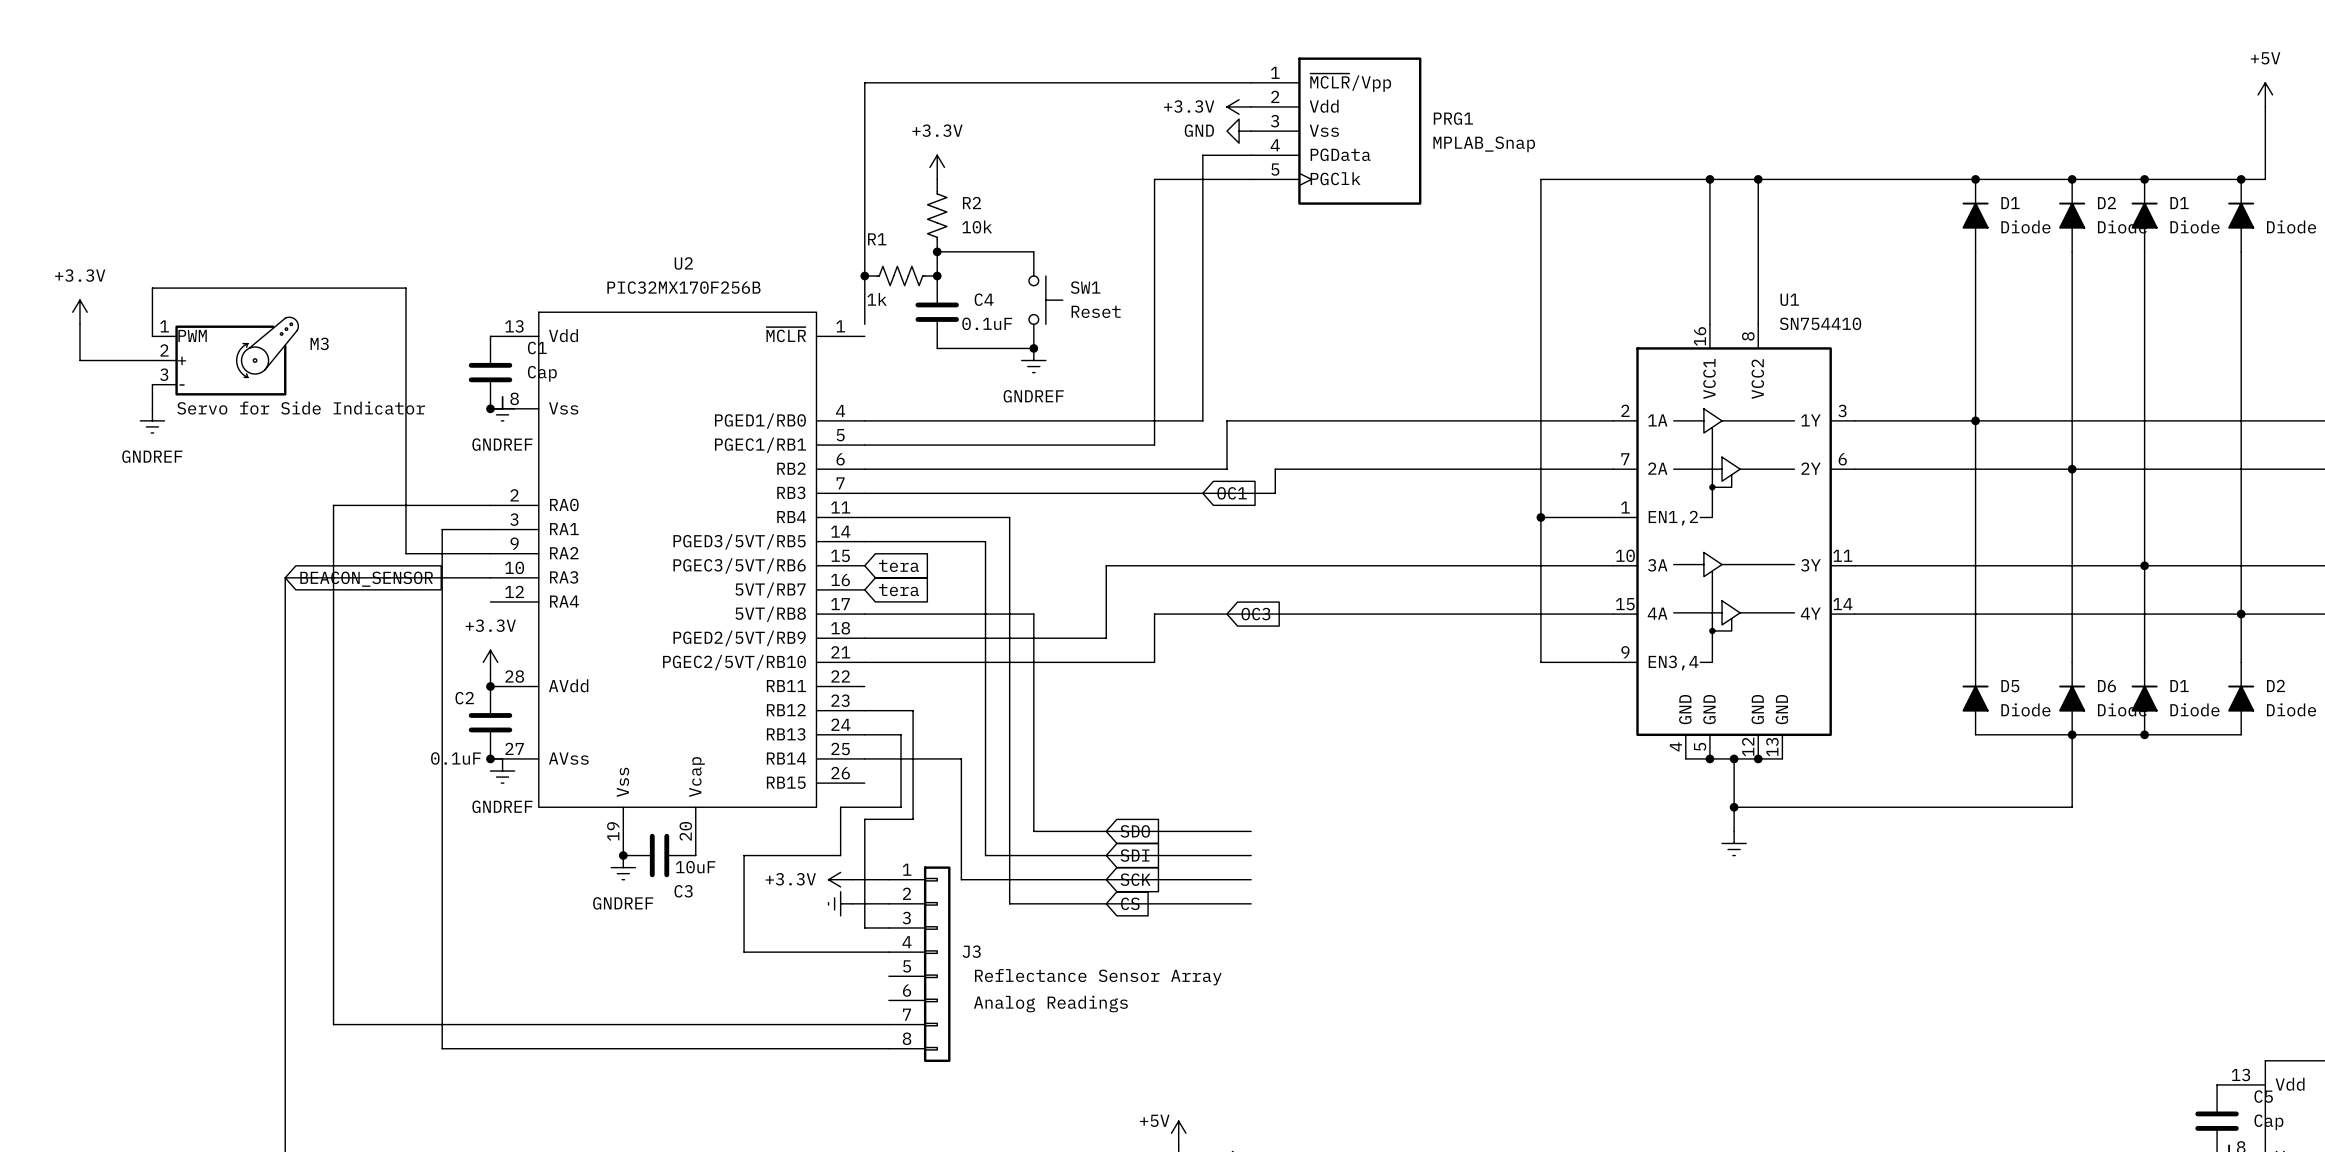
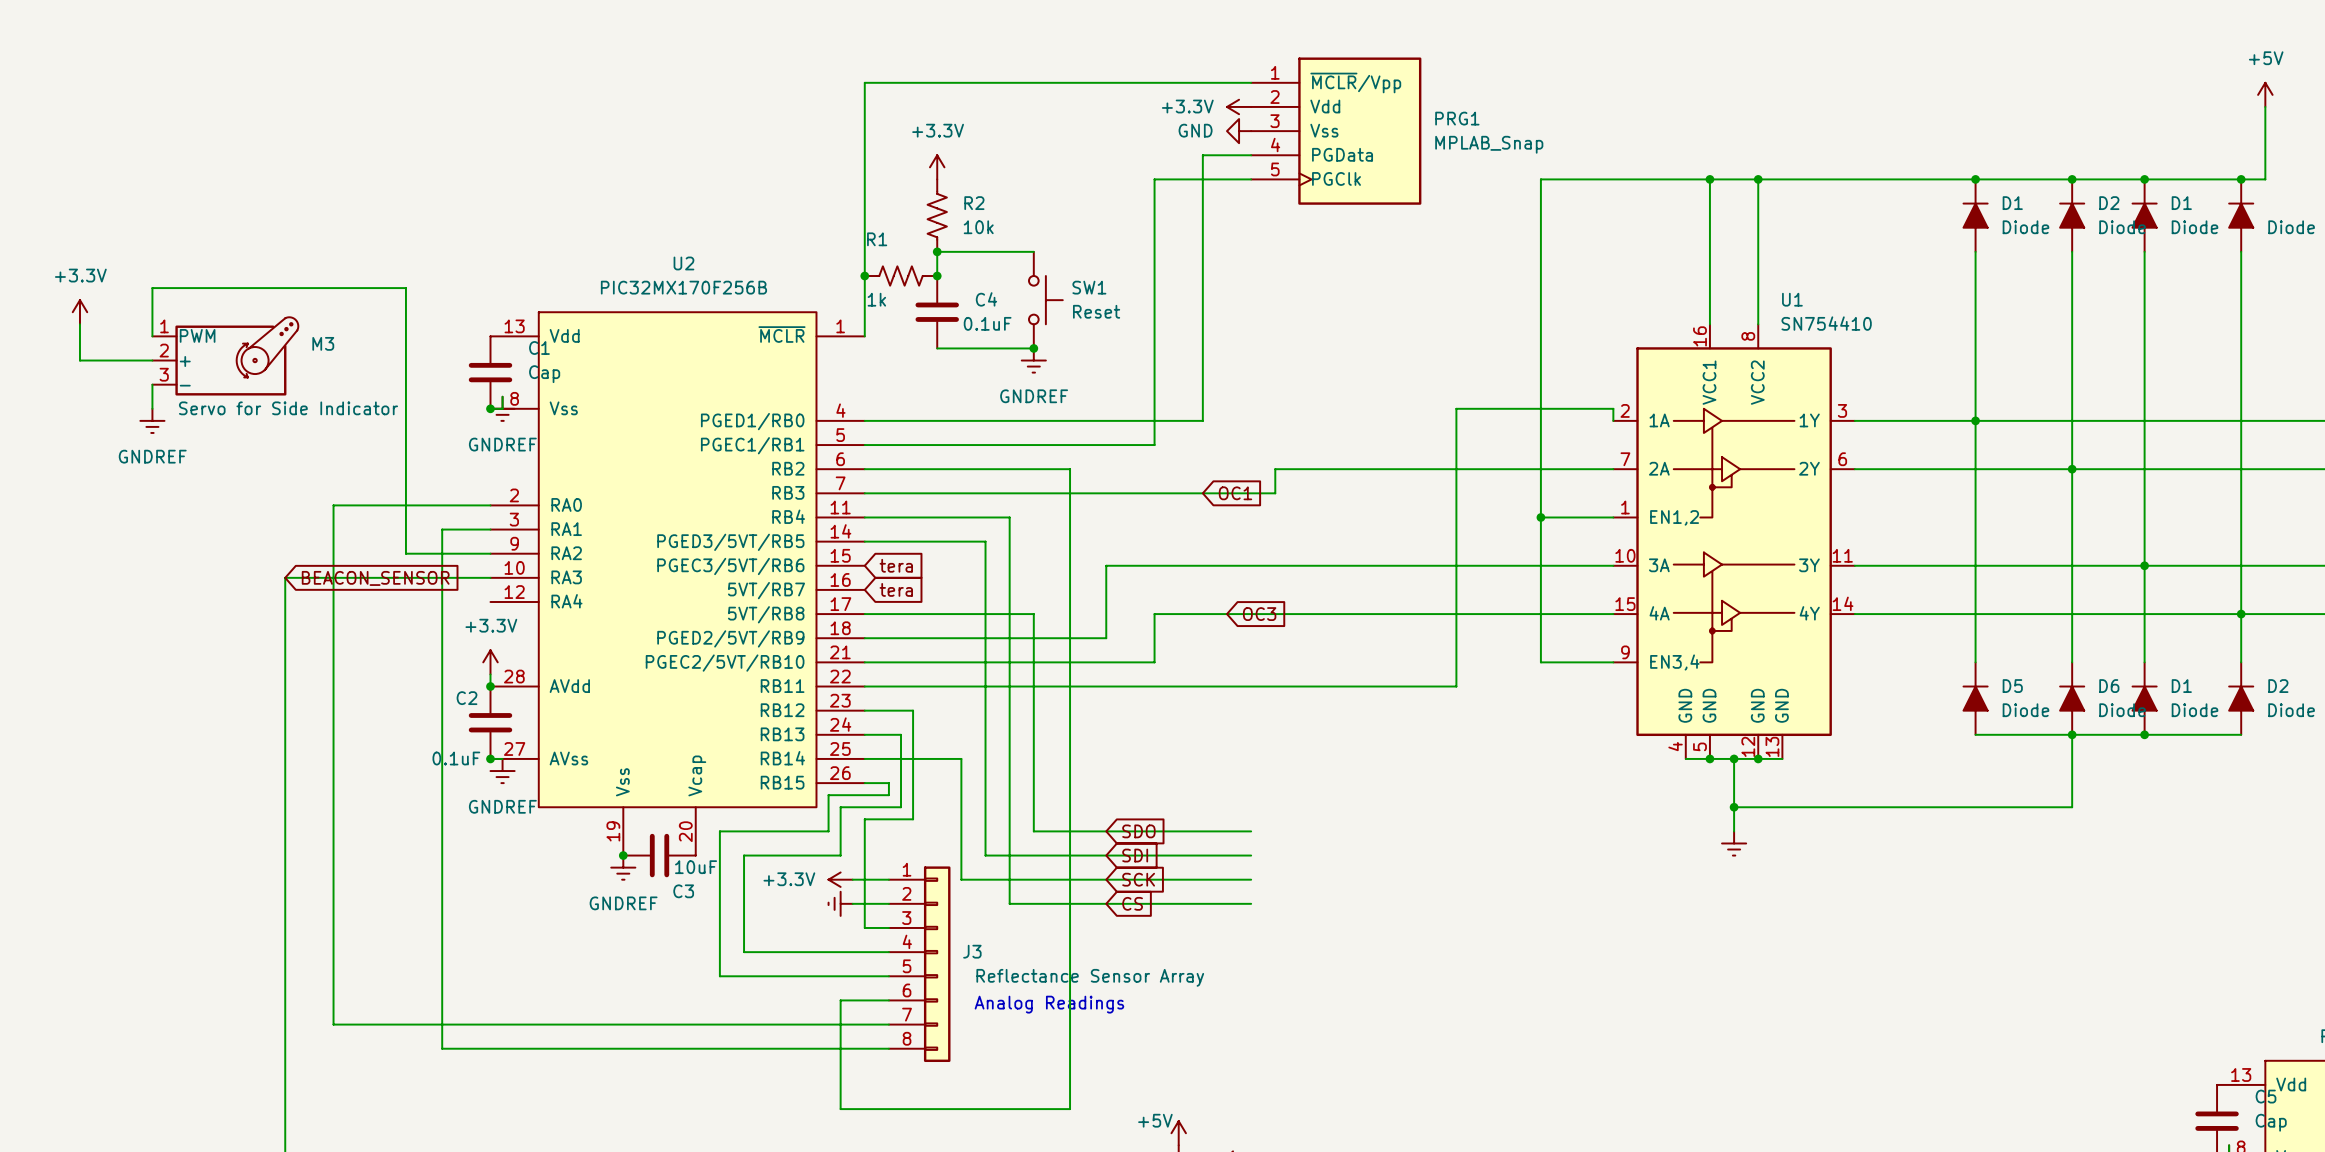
wire: none -> (864, 324) (864, 336)
wire: (1613, 420) (1226, 420) (1226, 469) (1070, 469) -> (1613, 420) (1613, 408) (1456, 408) (1456, 686) (864, 686)
wire: none -> (1070, 469) (1070, 1109) (840, 1109) (840, 1000) (888, 1000)
wire: none -> (864, 783) (888, 783) (888, 795) (828, 795) (828, 831) (719, 831) (719, 976) (888, 976)

